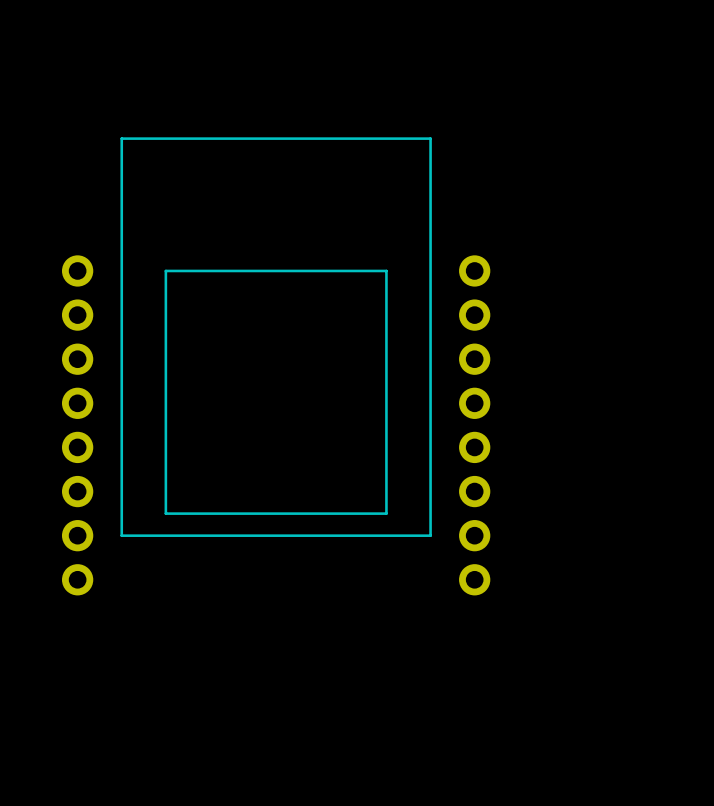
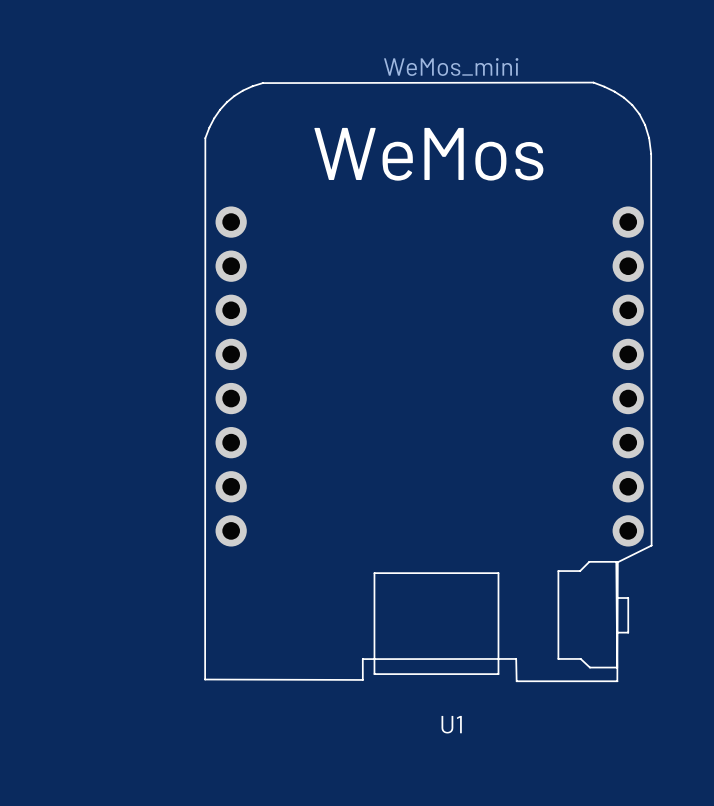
U1 side: bottom (276, 366) -> top (428, 381)

